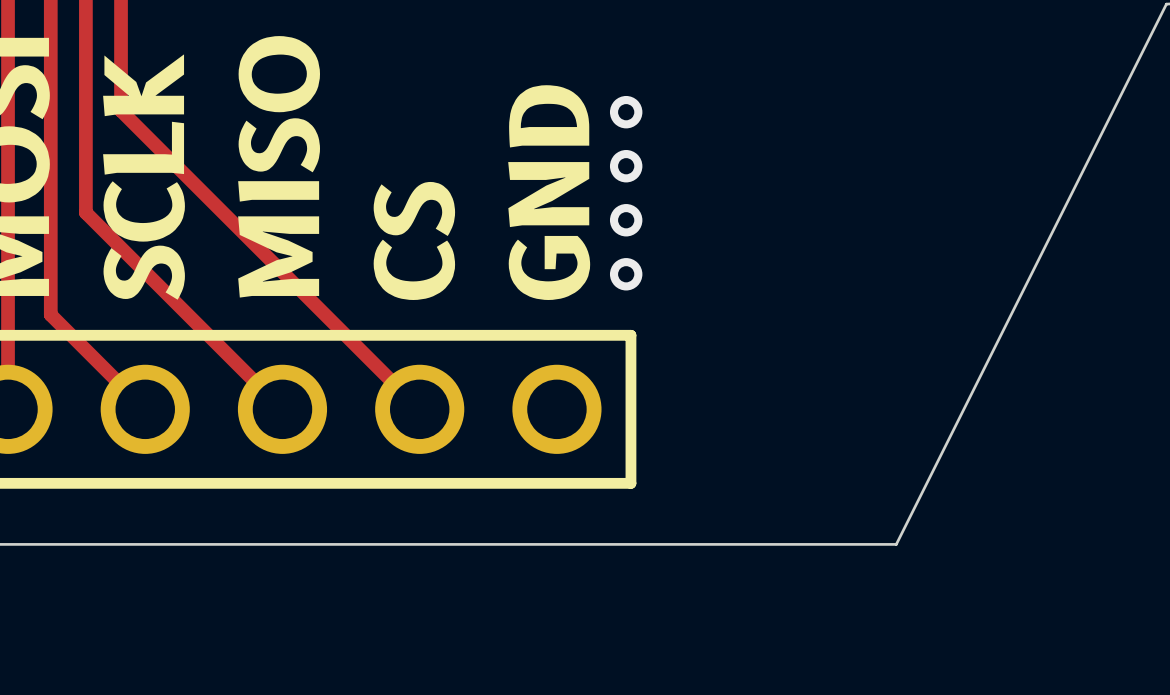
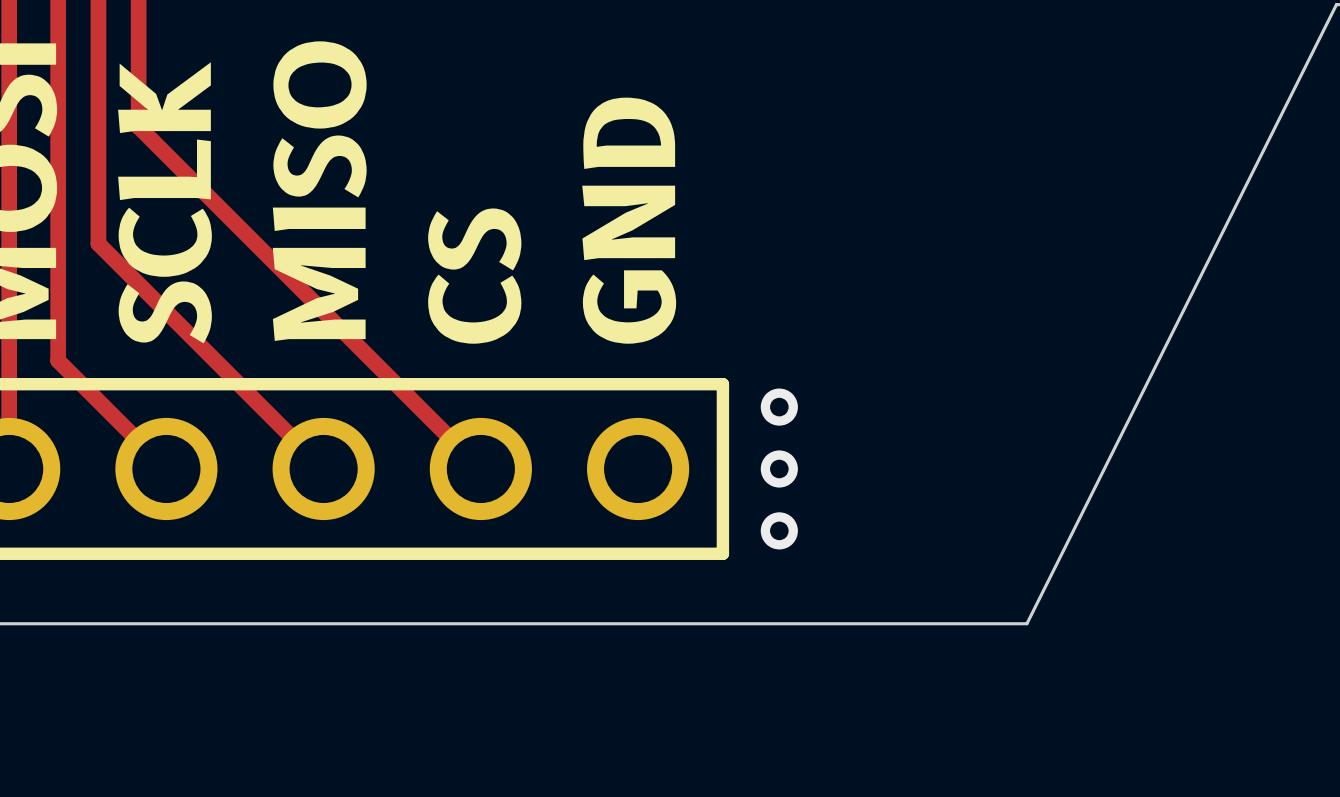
via: (626, 112) -> none
via: (626, 166) -> none
via: (626, 220) -> none
via: (626, 274) -> none
via: none -> (779, 407)
via: none -> (779, 468)
via: none -> (779, 530)

